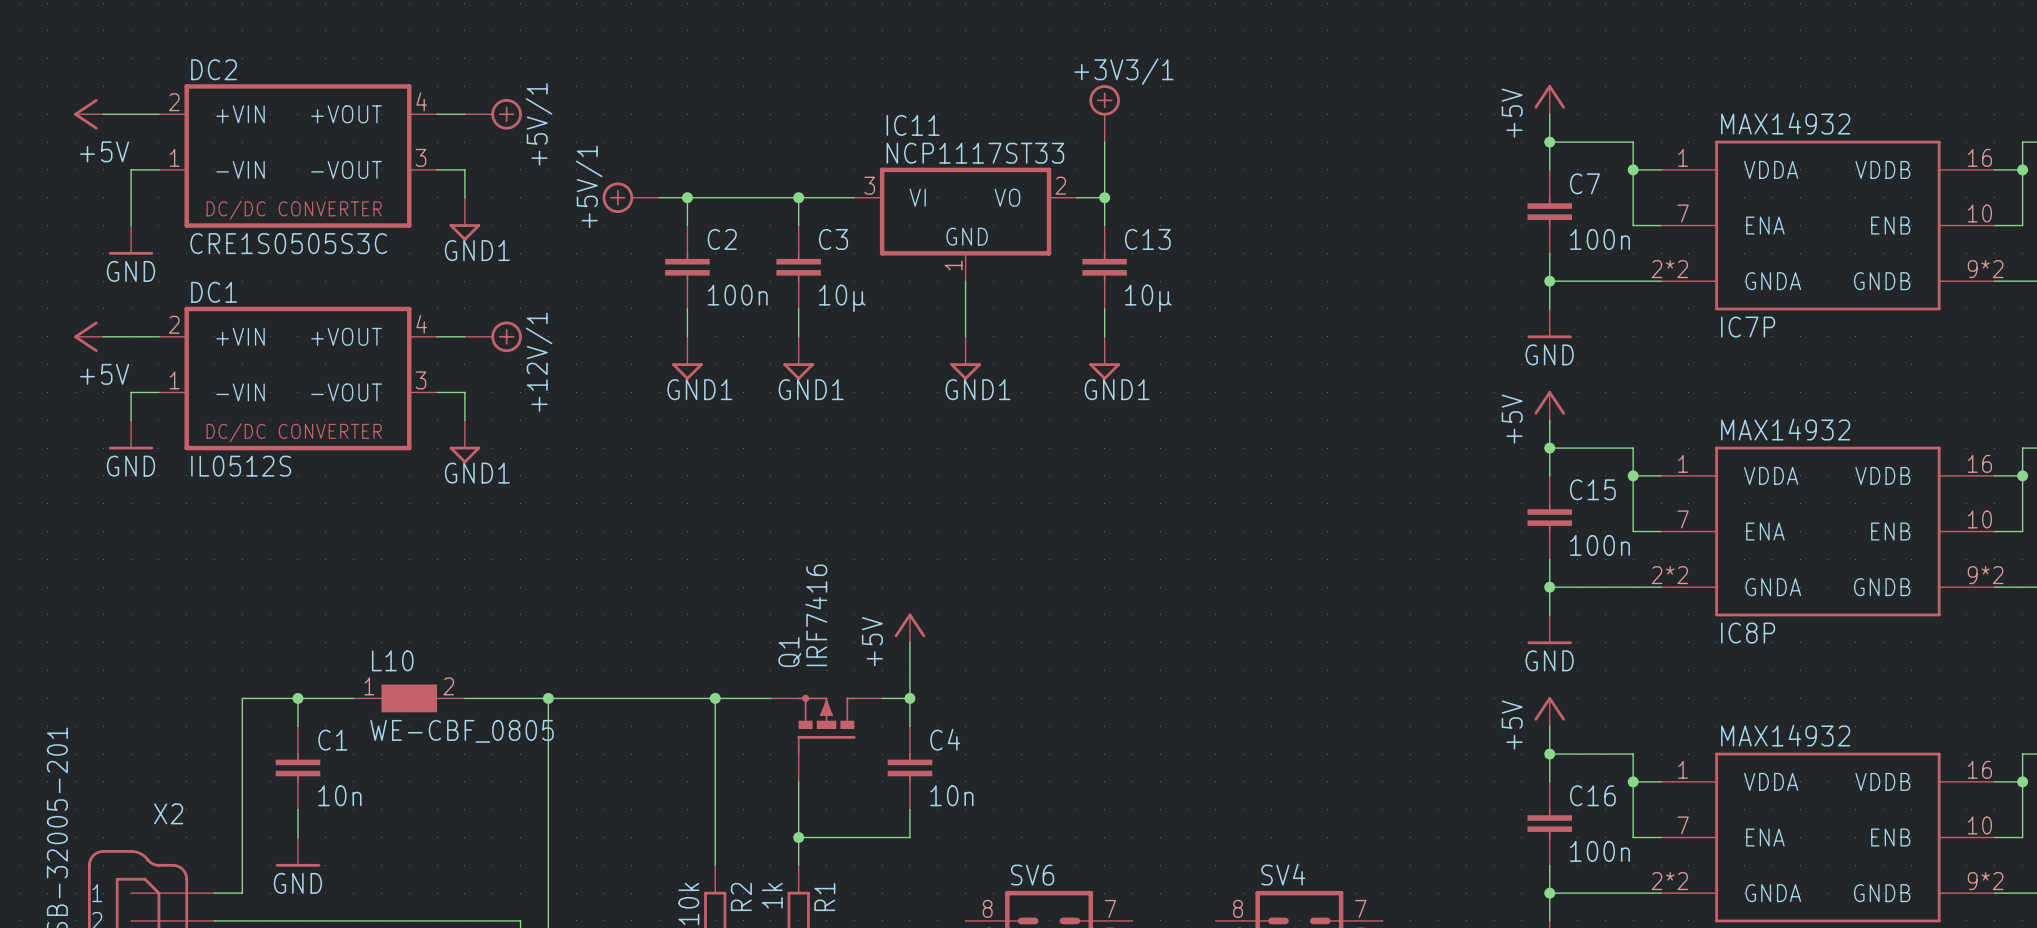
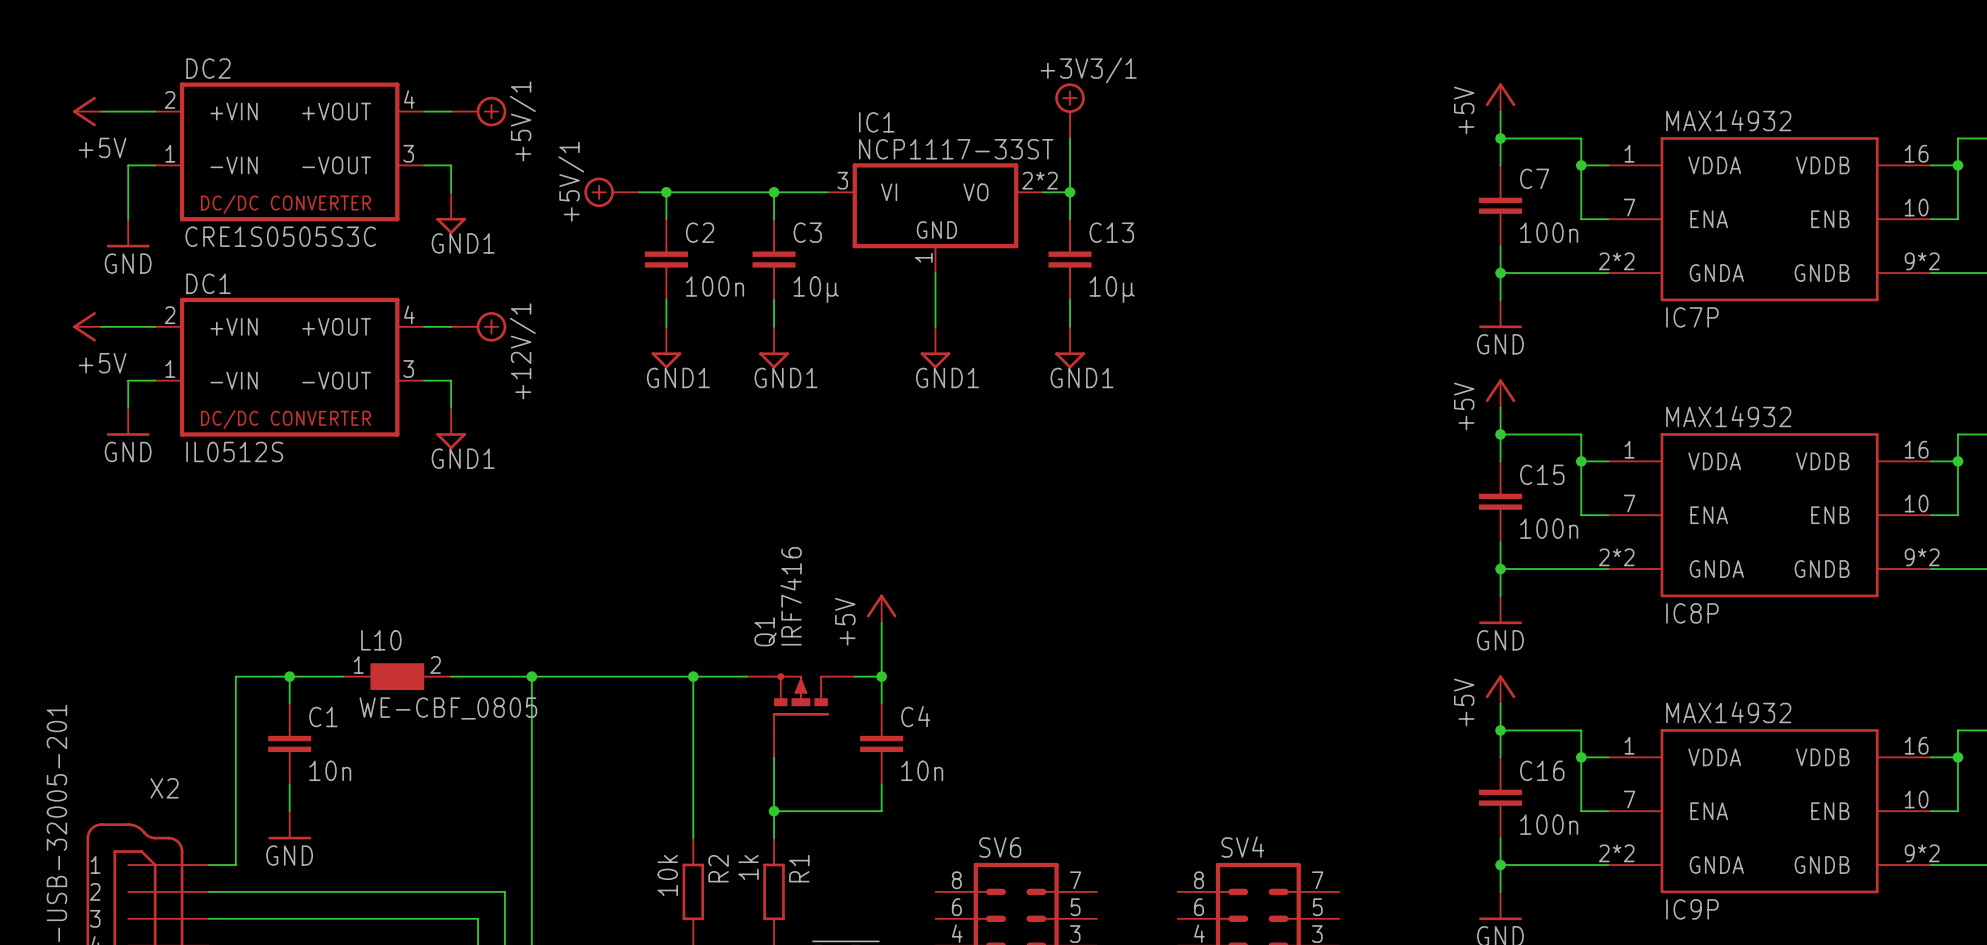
IC11 name: IC11 (913, 125) -> IC1 (876, 122)
IC11 value: NCP1117ST33 (975, 153) -> NCP1117-33ST (956, 149)
IC11 pin number: 2 (1060, 185) -> 2*2 (1039, 180)

